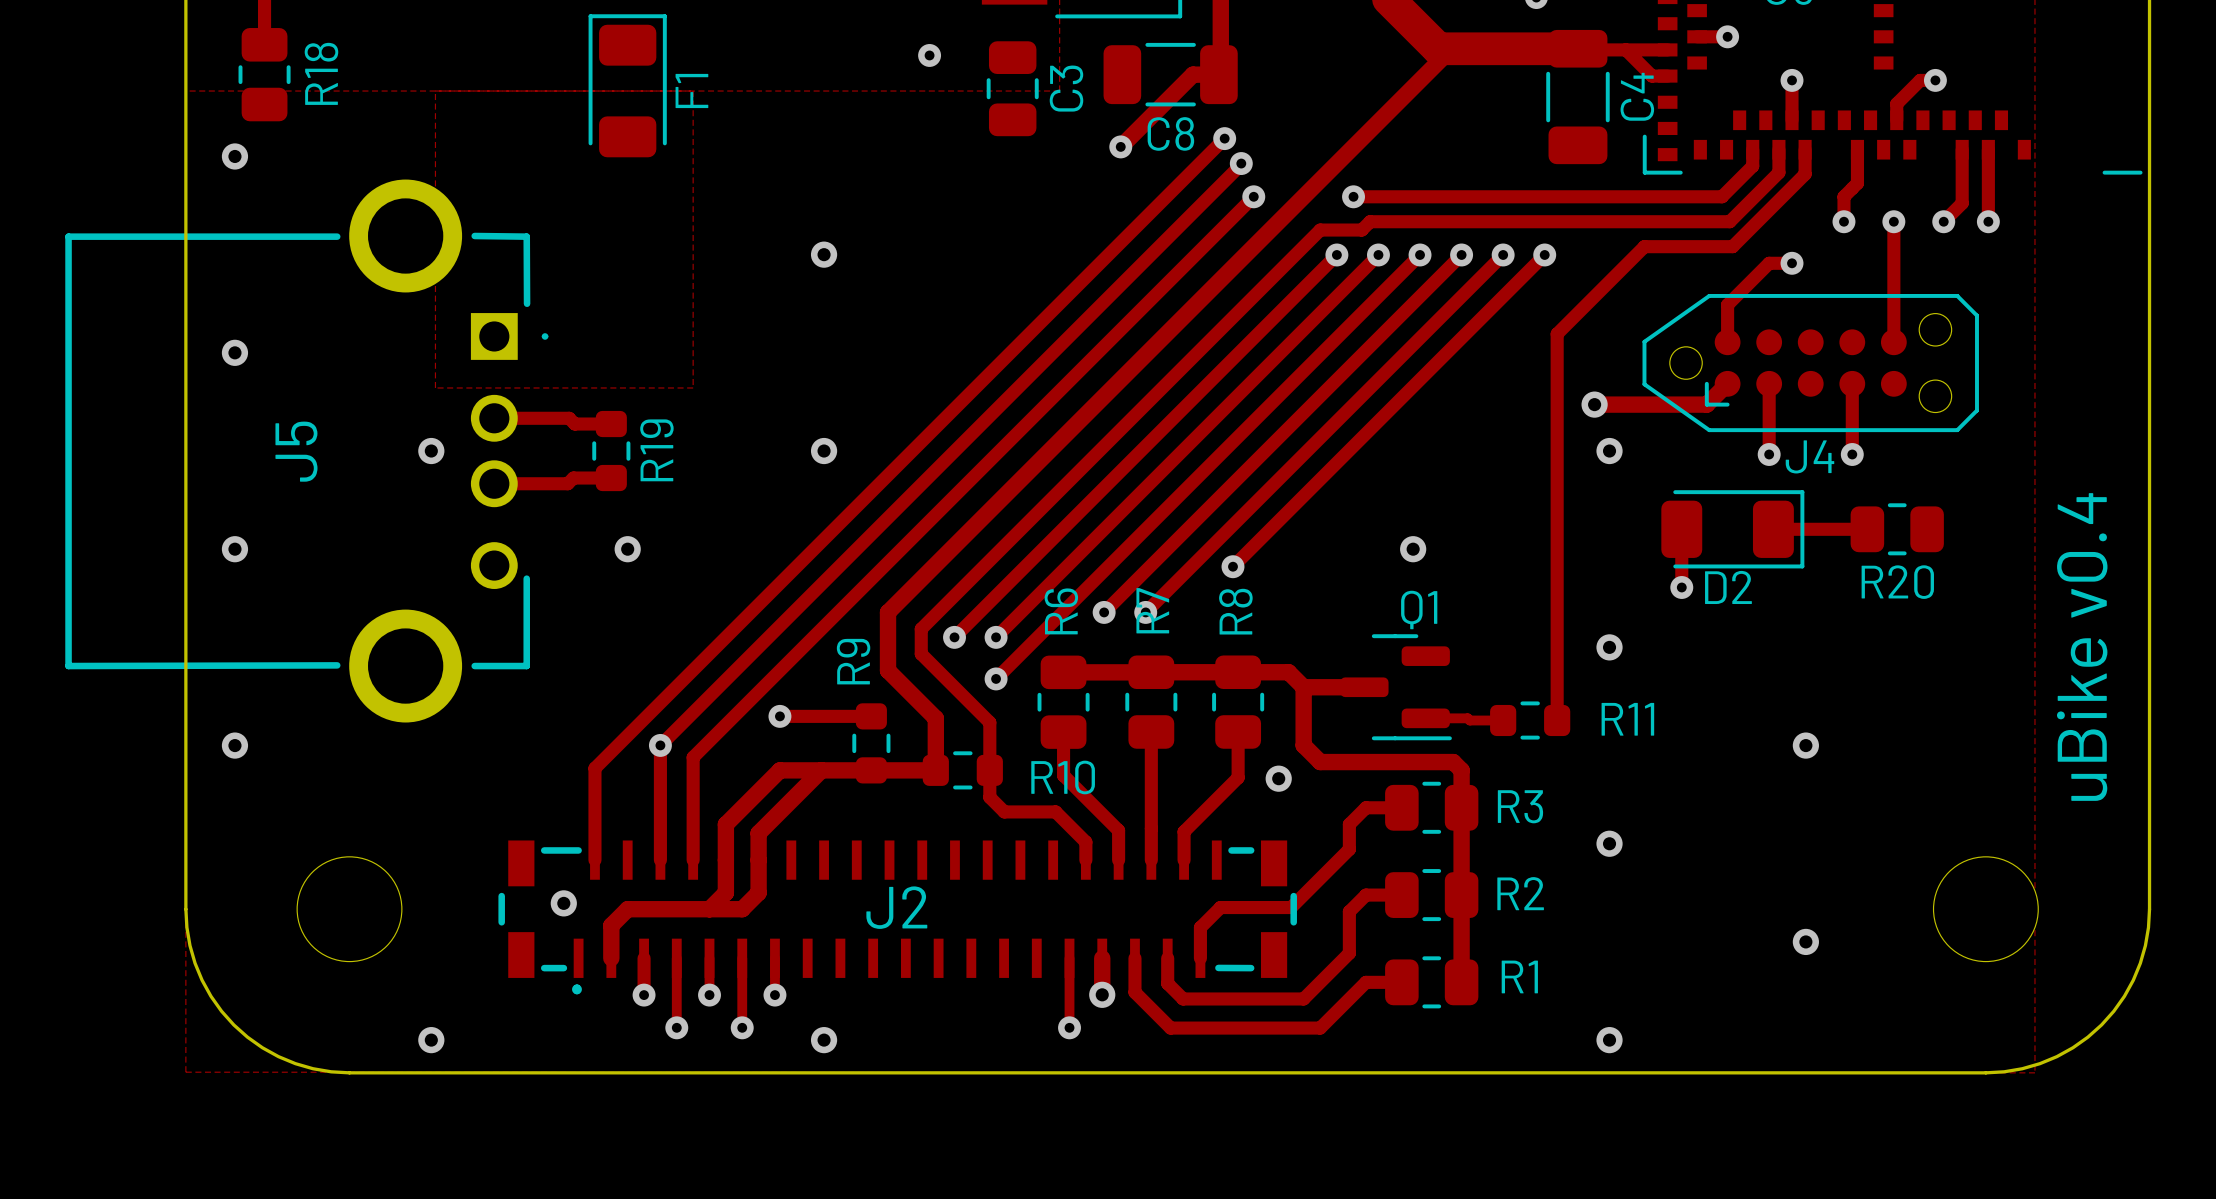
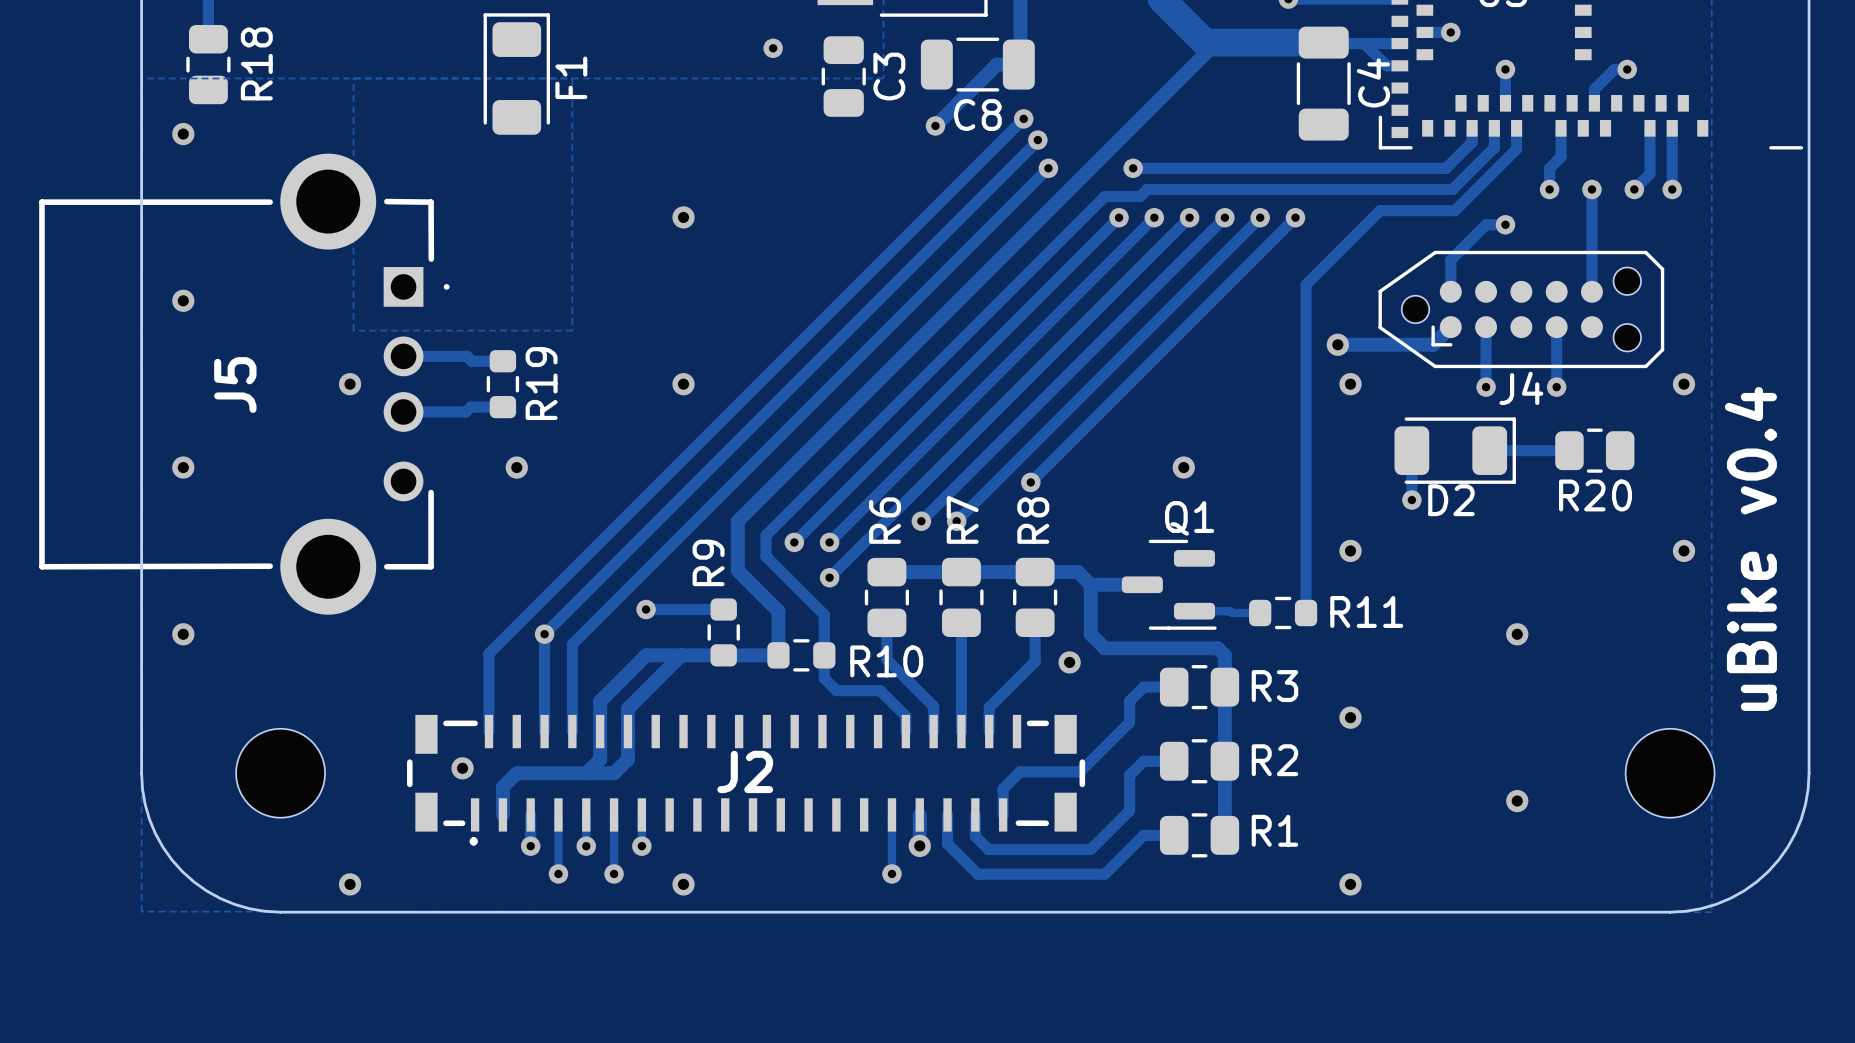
via: none -> (1684, 384)
via: none -> (1684, 550)

